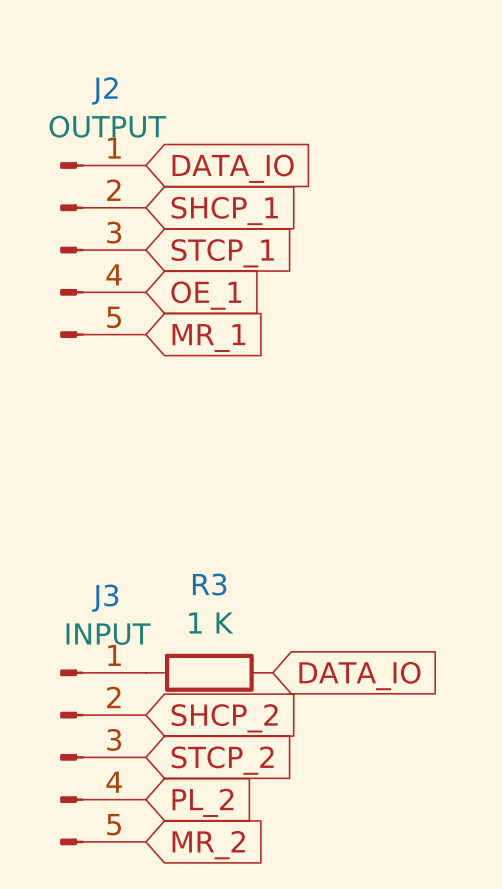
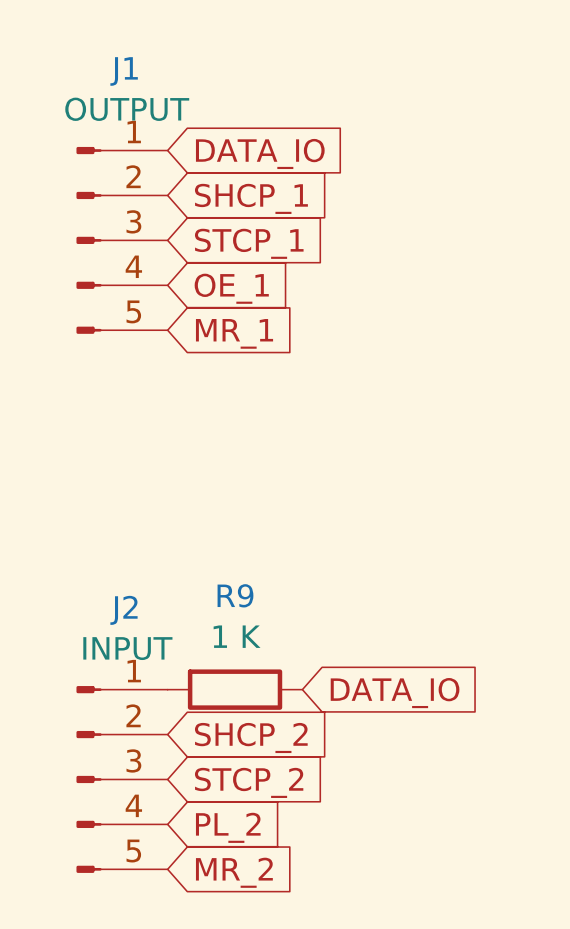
J2 name: J2 (104, 90) -> J1 (124, 71)
R3 name: R3 (209, 584) -> R9 (235, 595)
J3 name: J3 (105, 598) -> J2 (123, 610)

